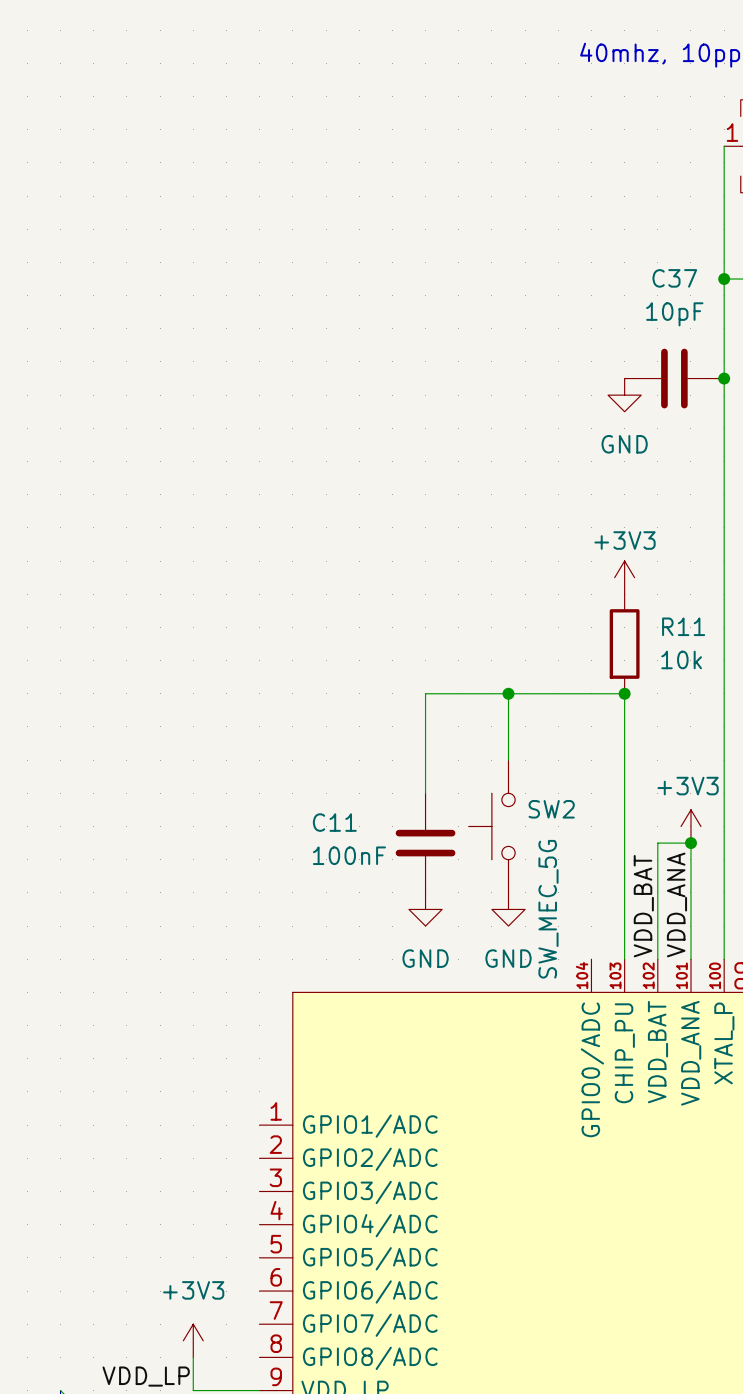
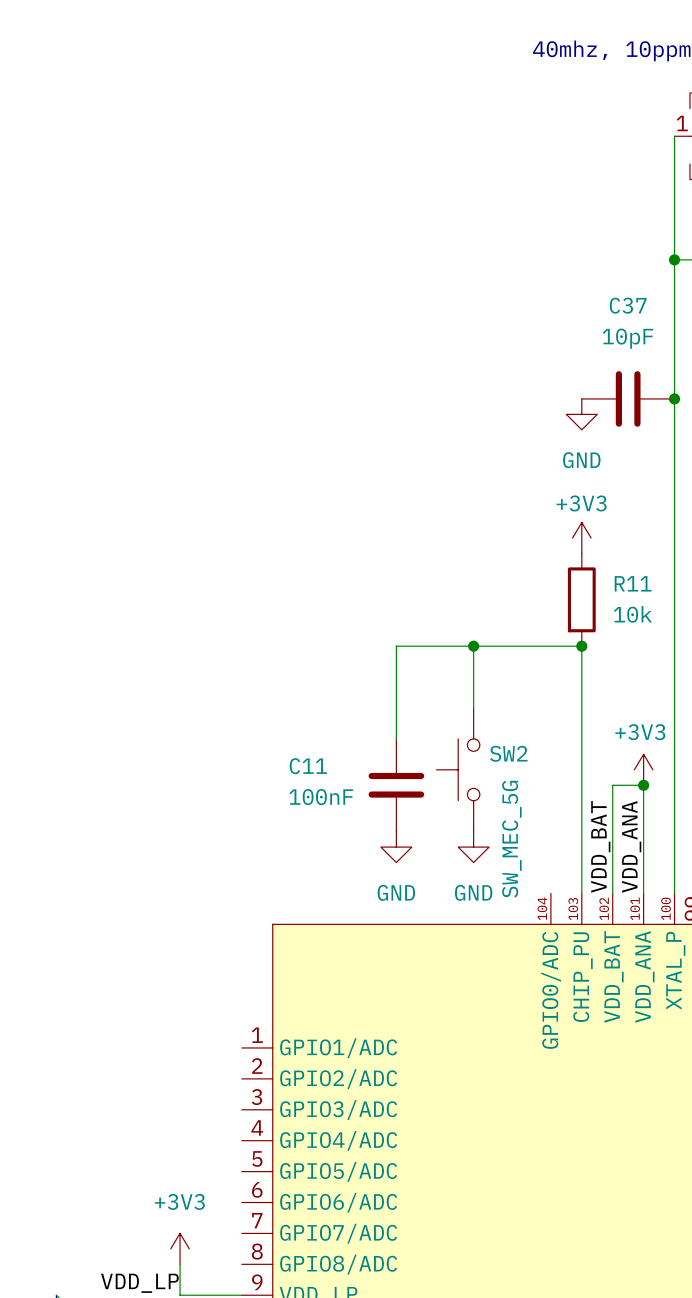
C37 position: (674, 378) -> (628, 398)
junction: (724, 378) -> none
power symbol position: GND (624, 395) -> GND (581, 414)
junction: none -> (674, 398)

